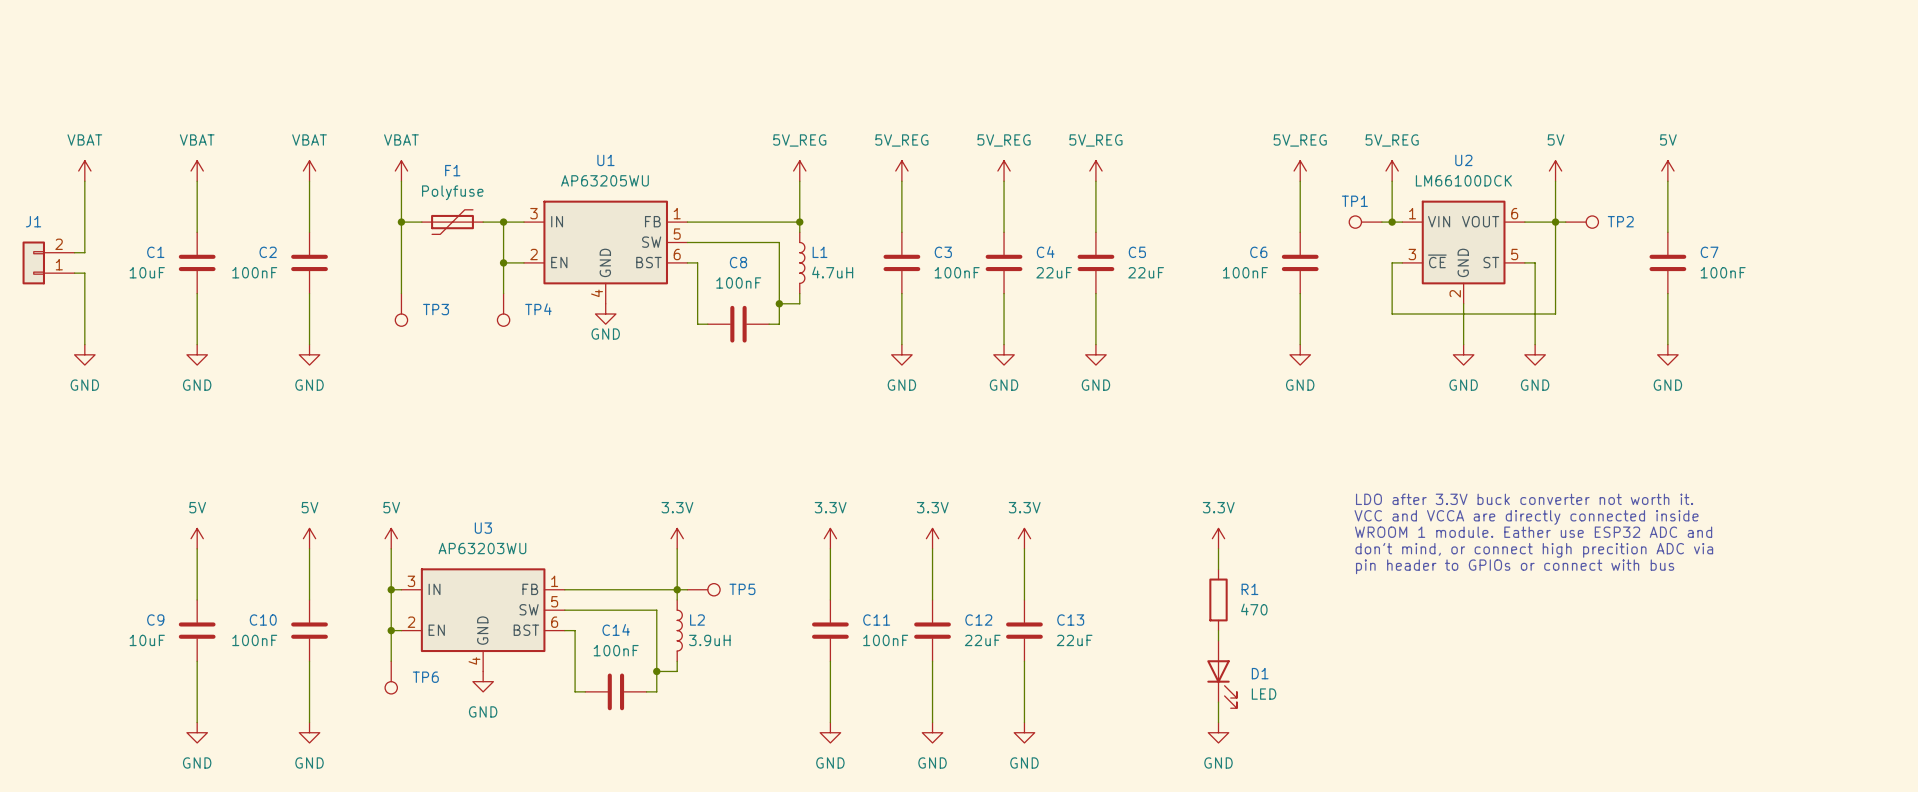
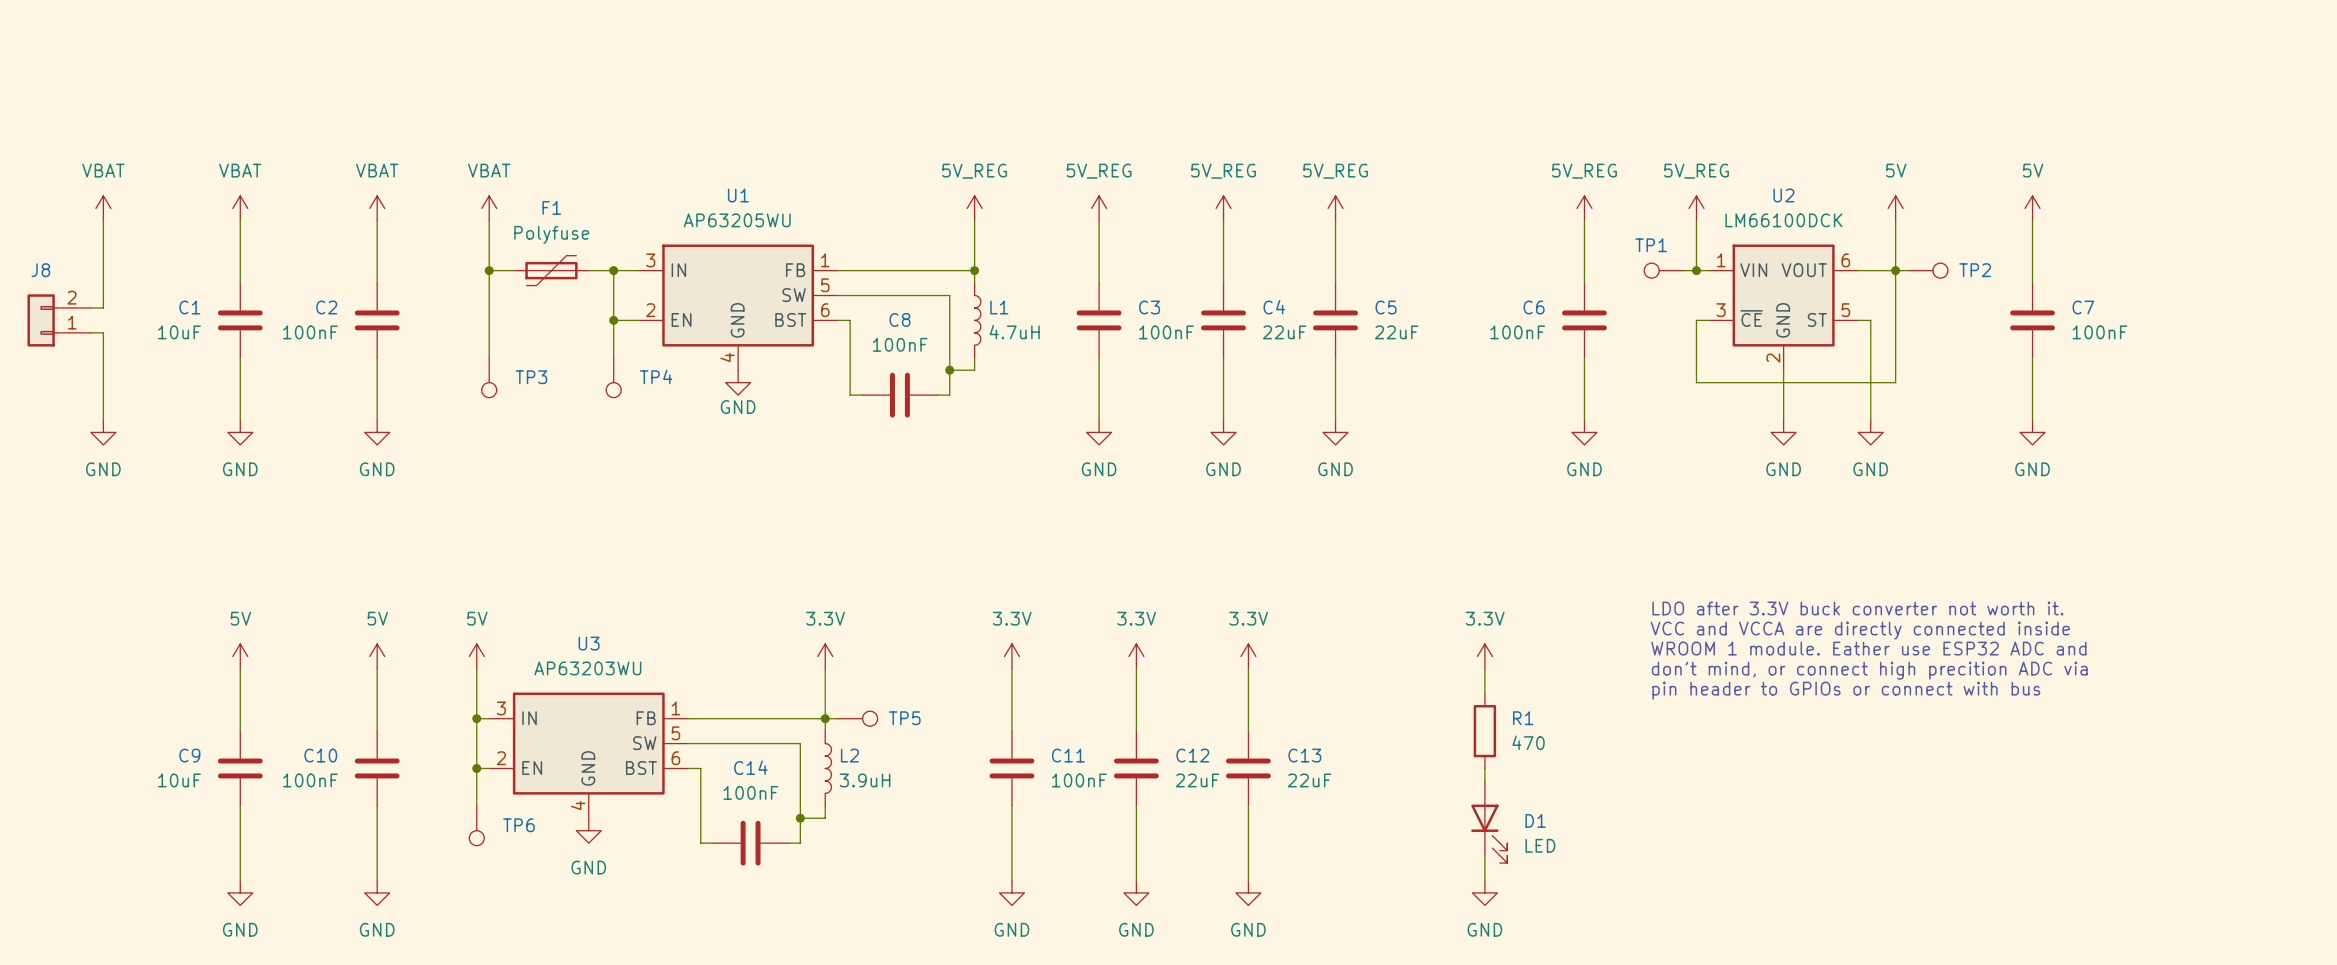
J1 name: J1 (33, 221) -> J8 (40, 270)

